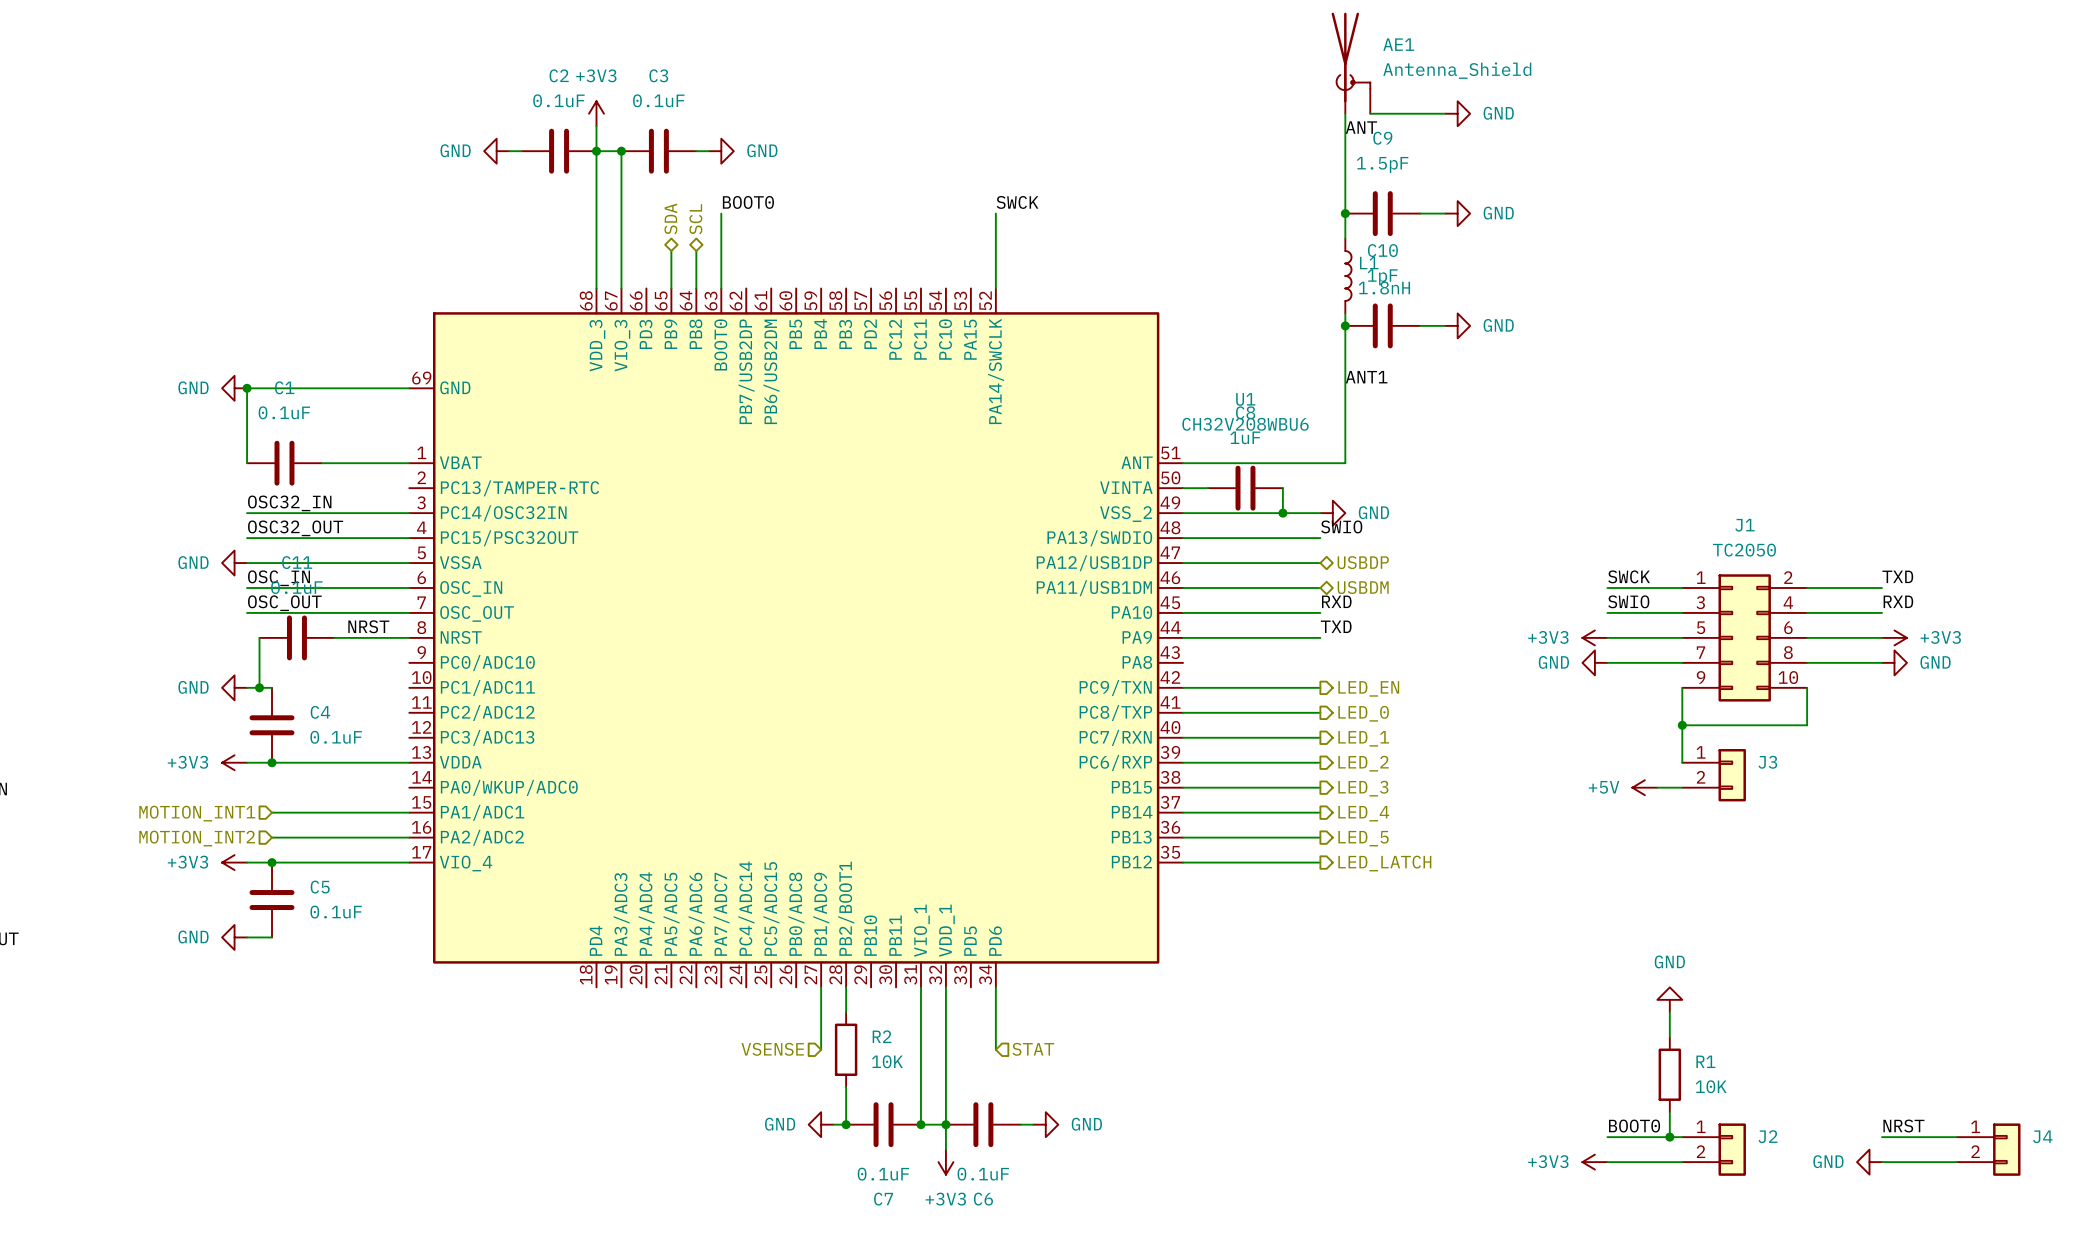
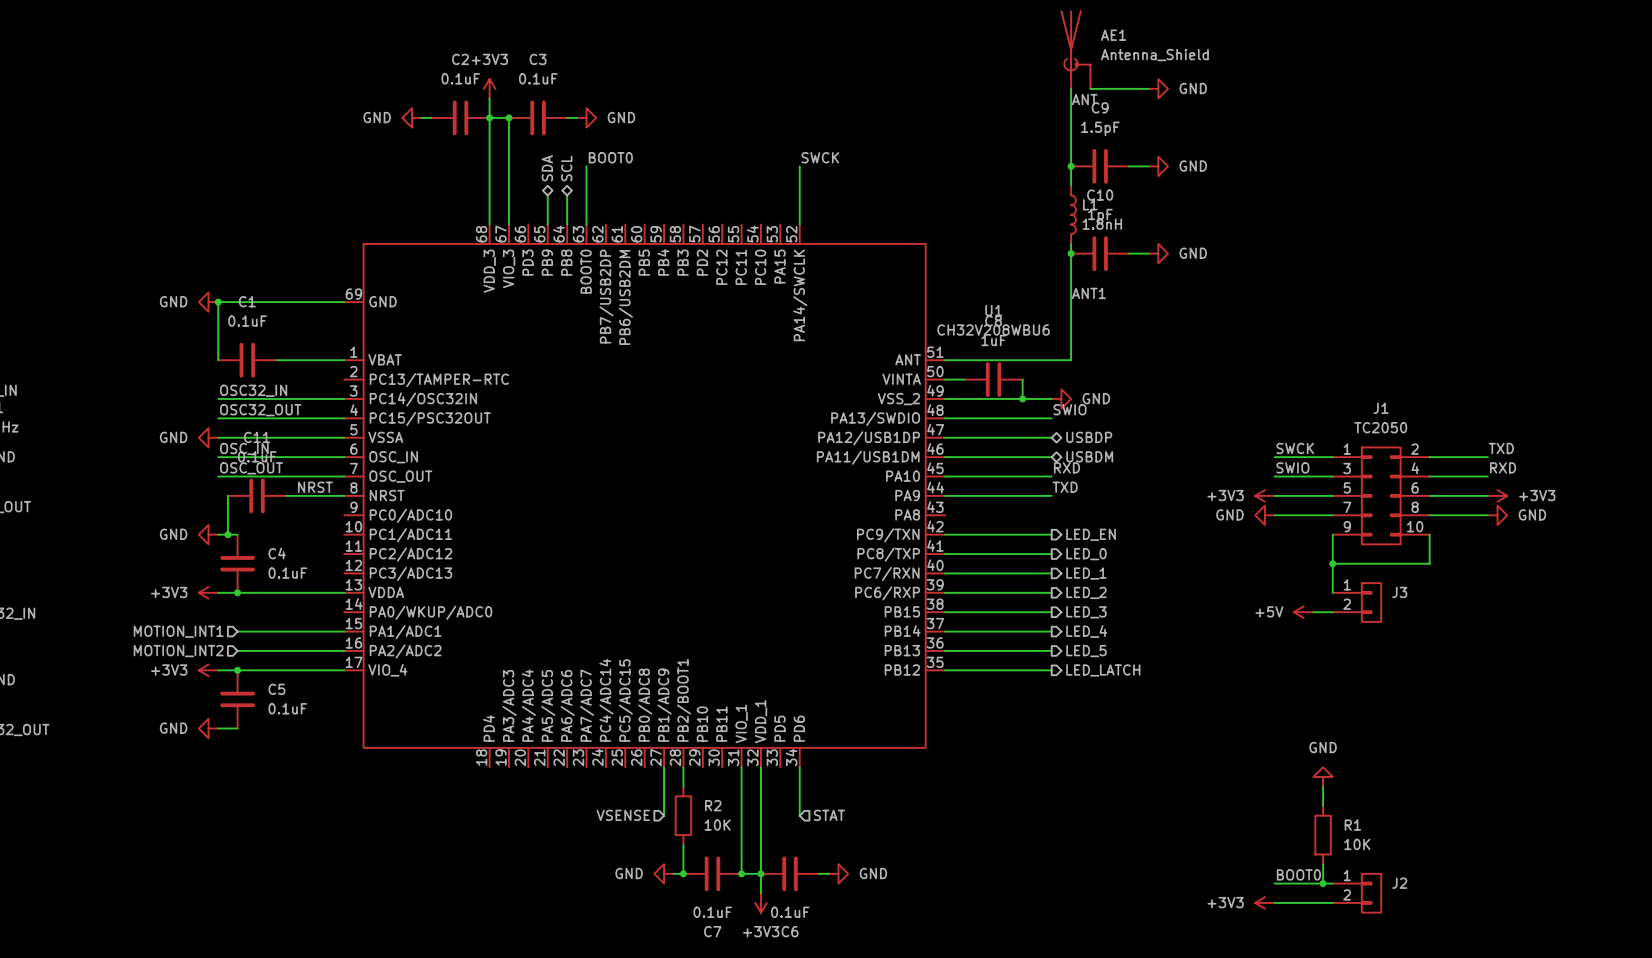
label: NRST (1903, 1126) -> none
wire: (1881, 1137) (1956, 1137) -> none
J4: (1988, 1149) -> none
power symbol: GND (1869, 1162) -> none
wire: (1881, 1162) (1956, 1162) -> none

